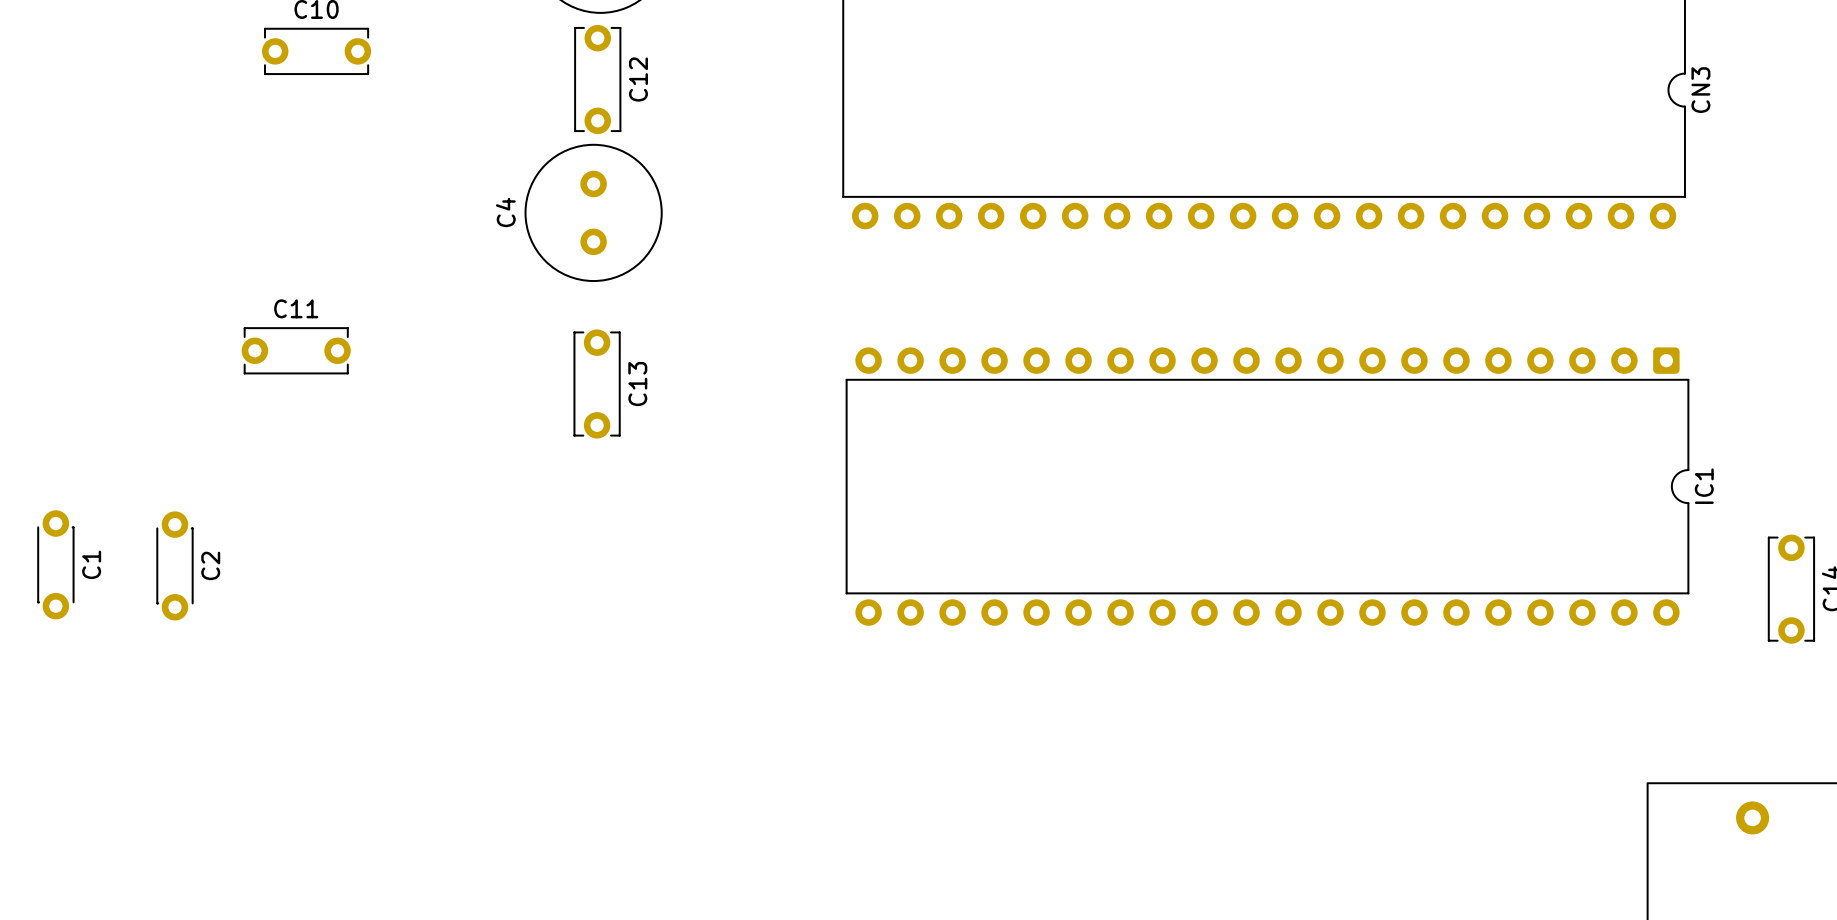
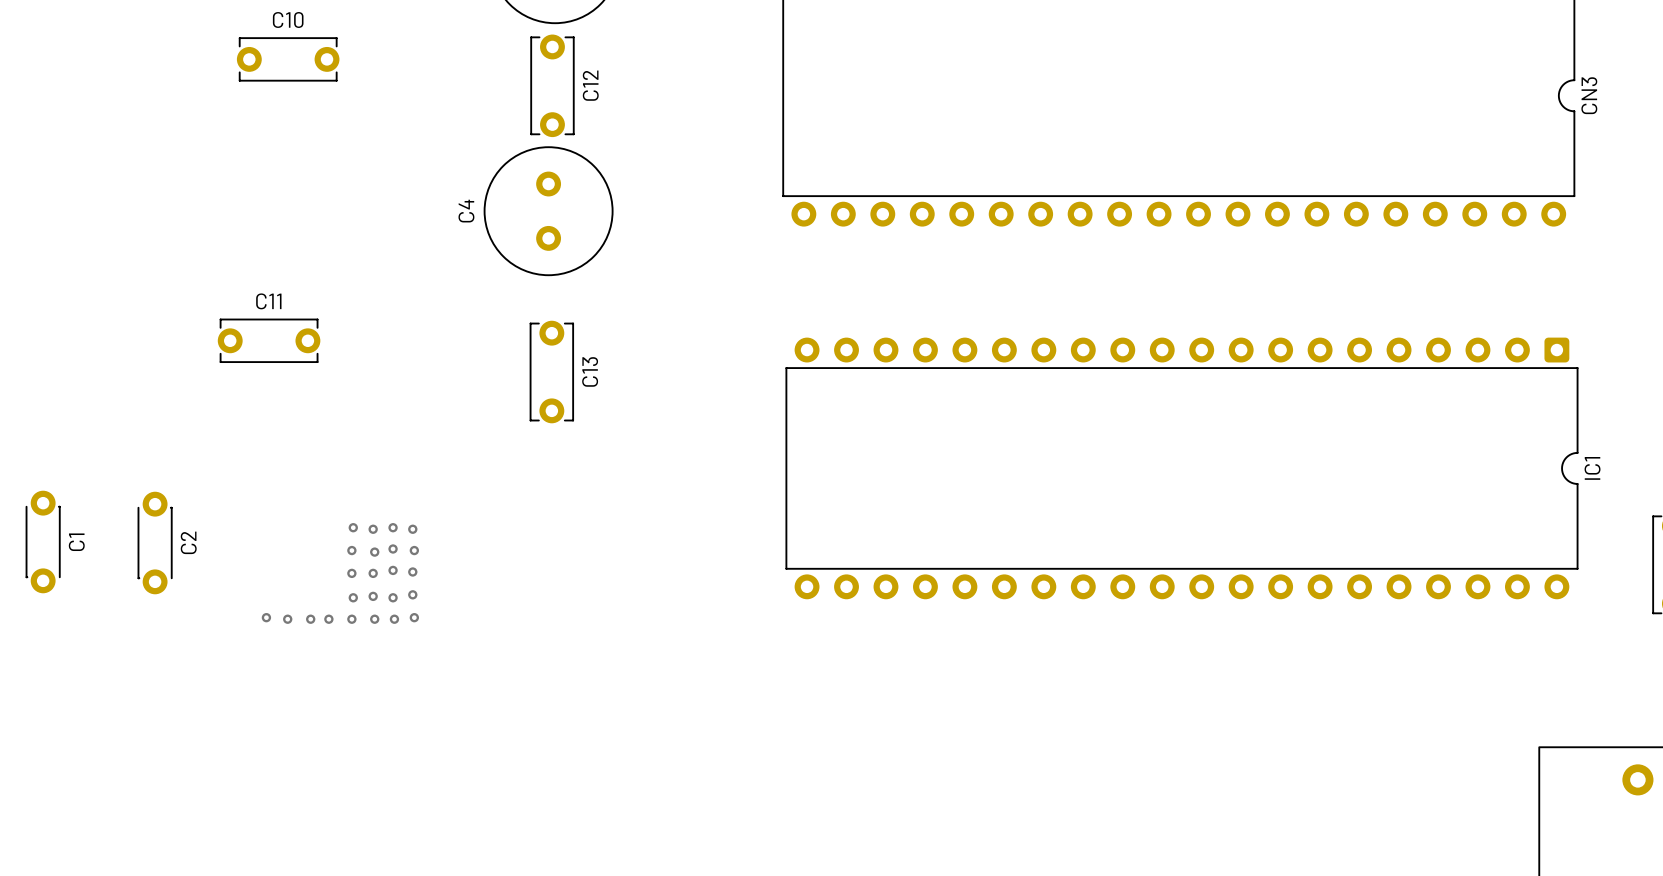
via: none -> (353, 527)
via: none -> (393, 527)
via: none -> (373, 529)
via: none -> (412, 529)
via: none -> (393, 548)
via: none -> (351, 550)
via: none -> (414, 550)
via: none -> (374, 552)
via: none -> (393, 570)
via: none -> (412, 571)
via: none -> (351, 573)
via: none -> (373, 573)
via: none -> (412, 594)
via: none -> (373, 596)
via: none -> (353, 597)
via: none -> (393, 597)
via: none -> (266, 617)
via: none -> (414, 617)
via: none -> (287, 619)
via: none -> (310, 619)
via: none -> (328, 619)
via: none -> (351, 619)
via: none -> (374, 619)
via: none -> (394, 619)

